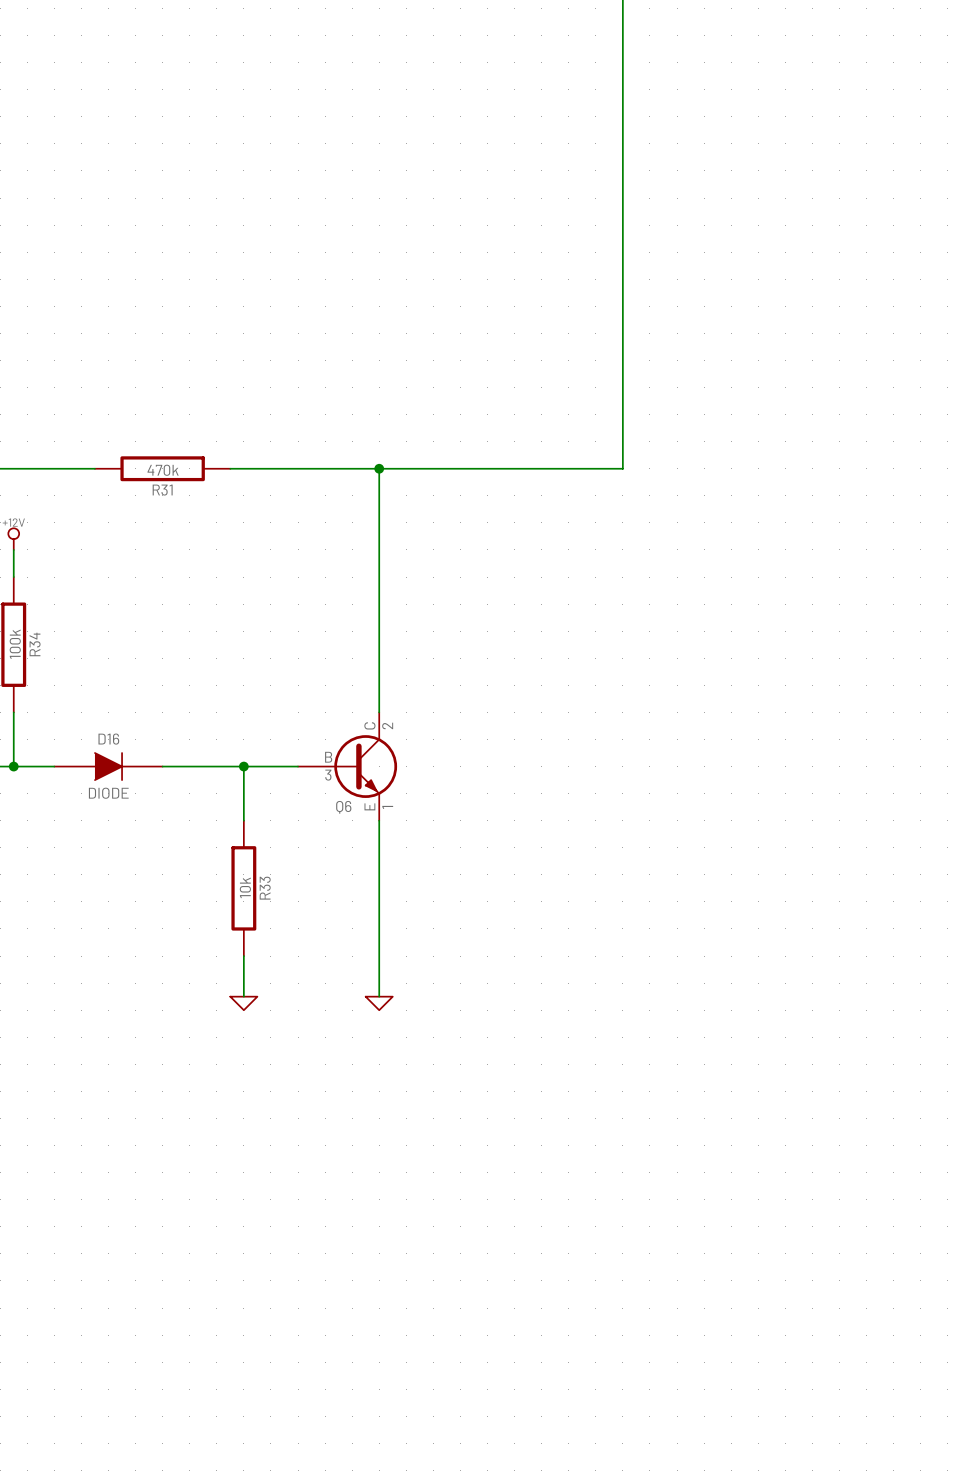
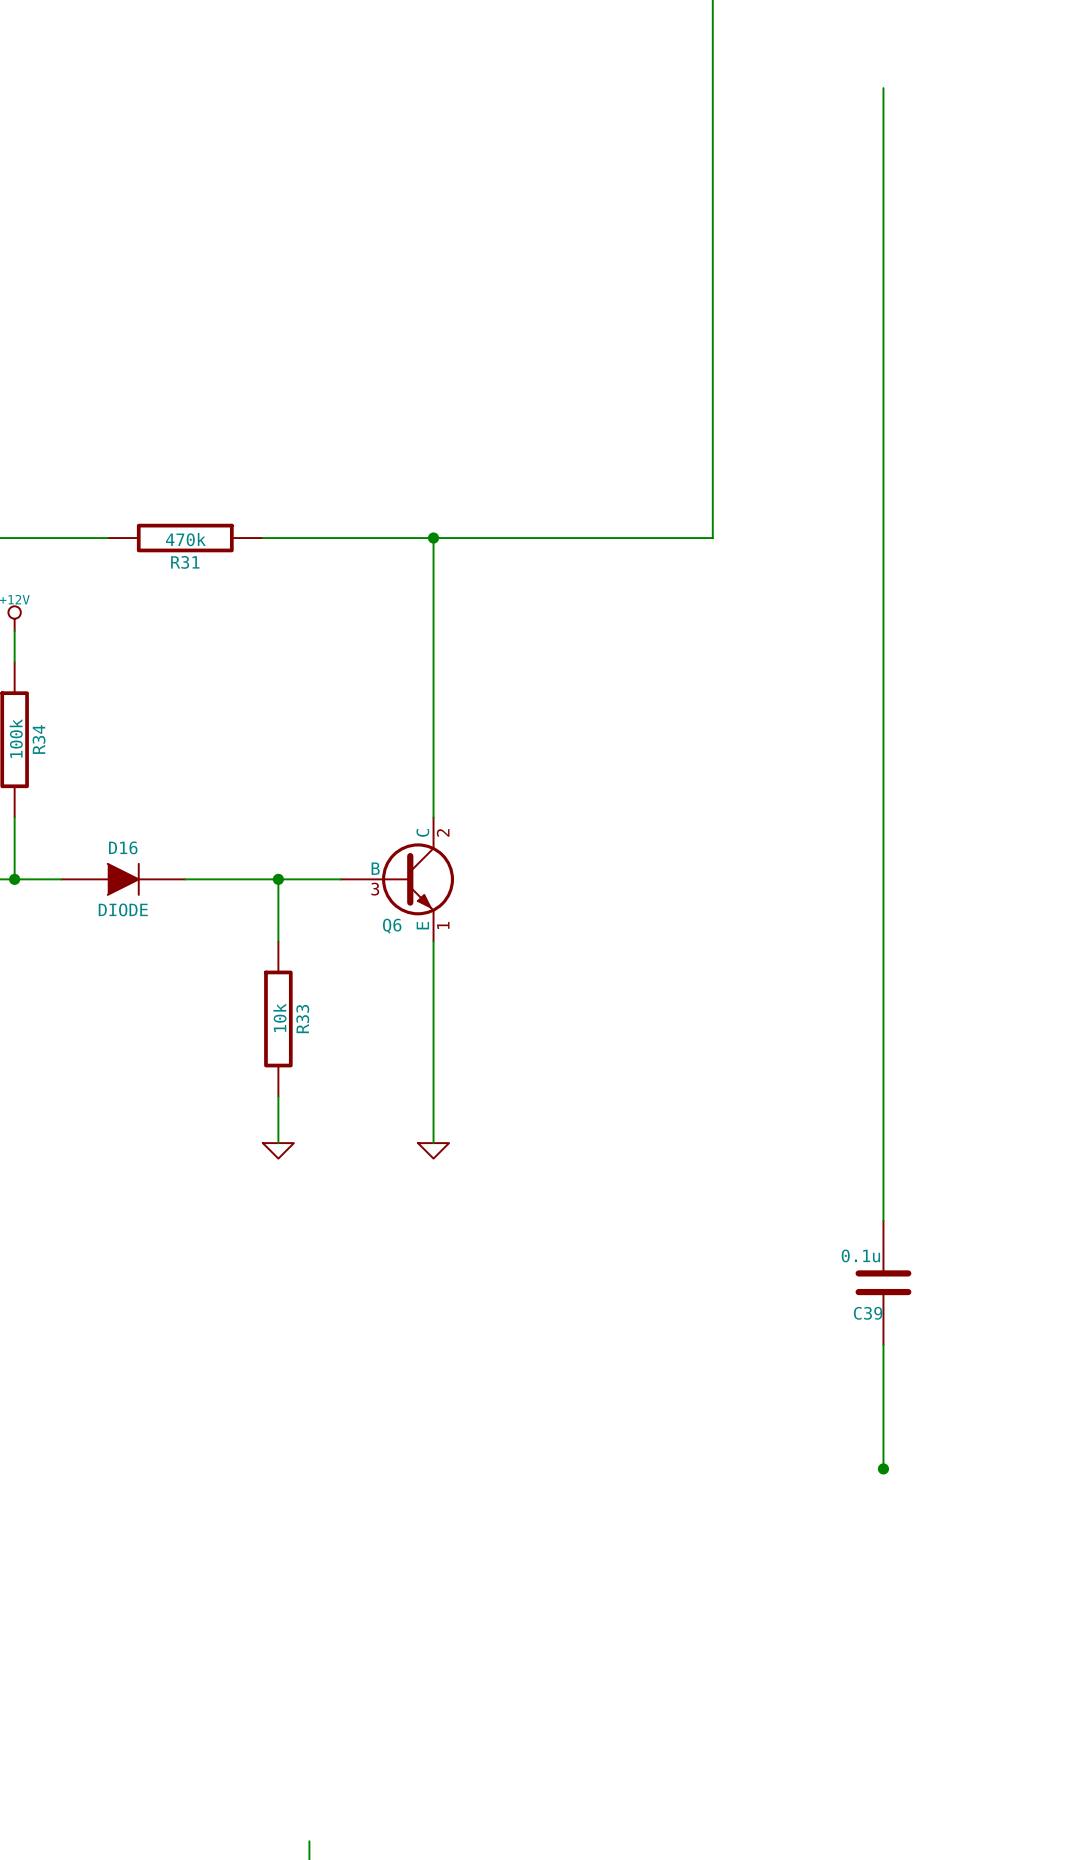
wire: none -> (883, 88) (883, 1220)
C39: none -> 0.1u (883, 1282)
wire: none -> (883, 1344) (883, 1468)
junction: none -> (883, 1468)

